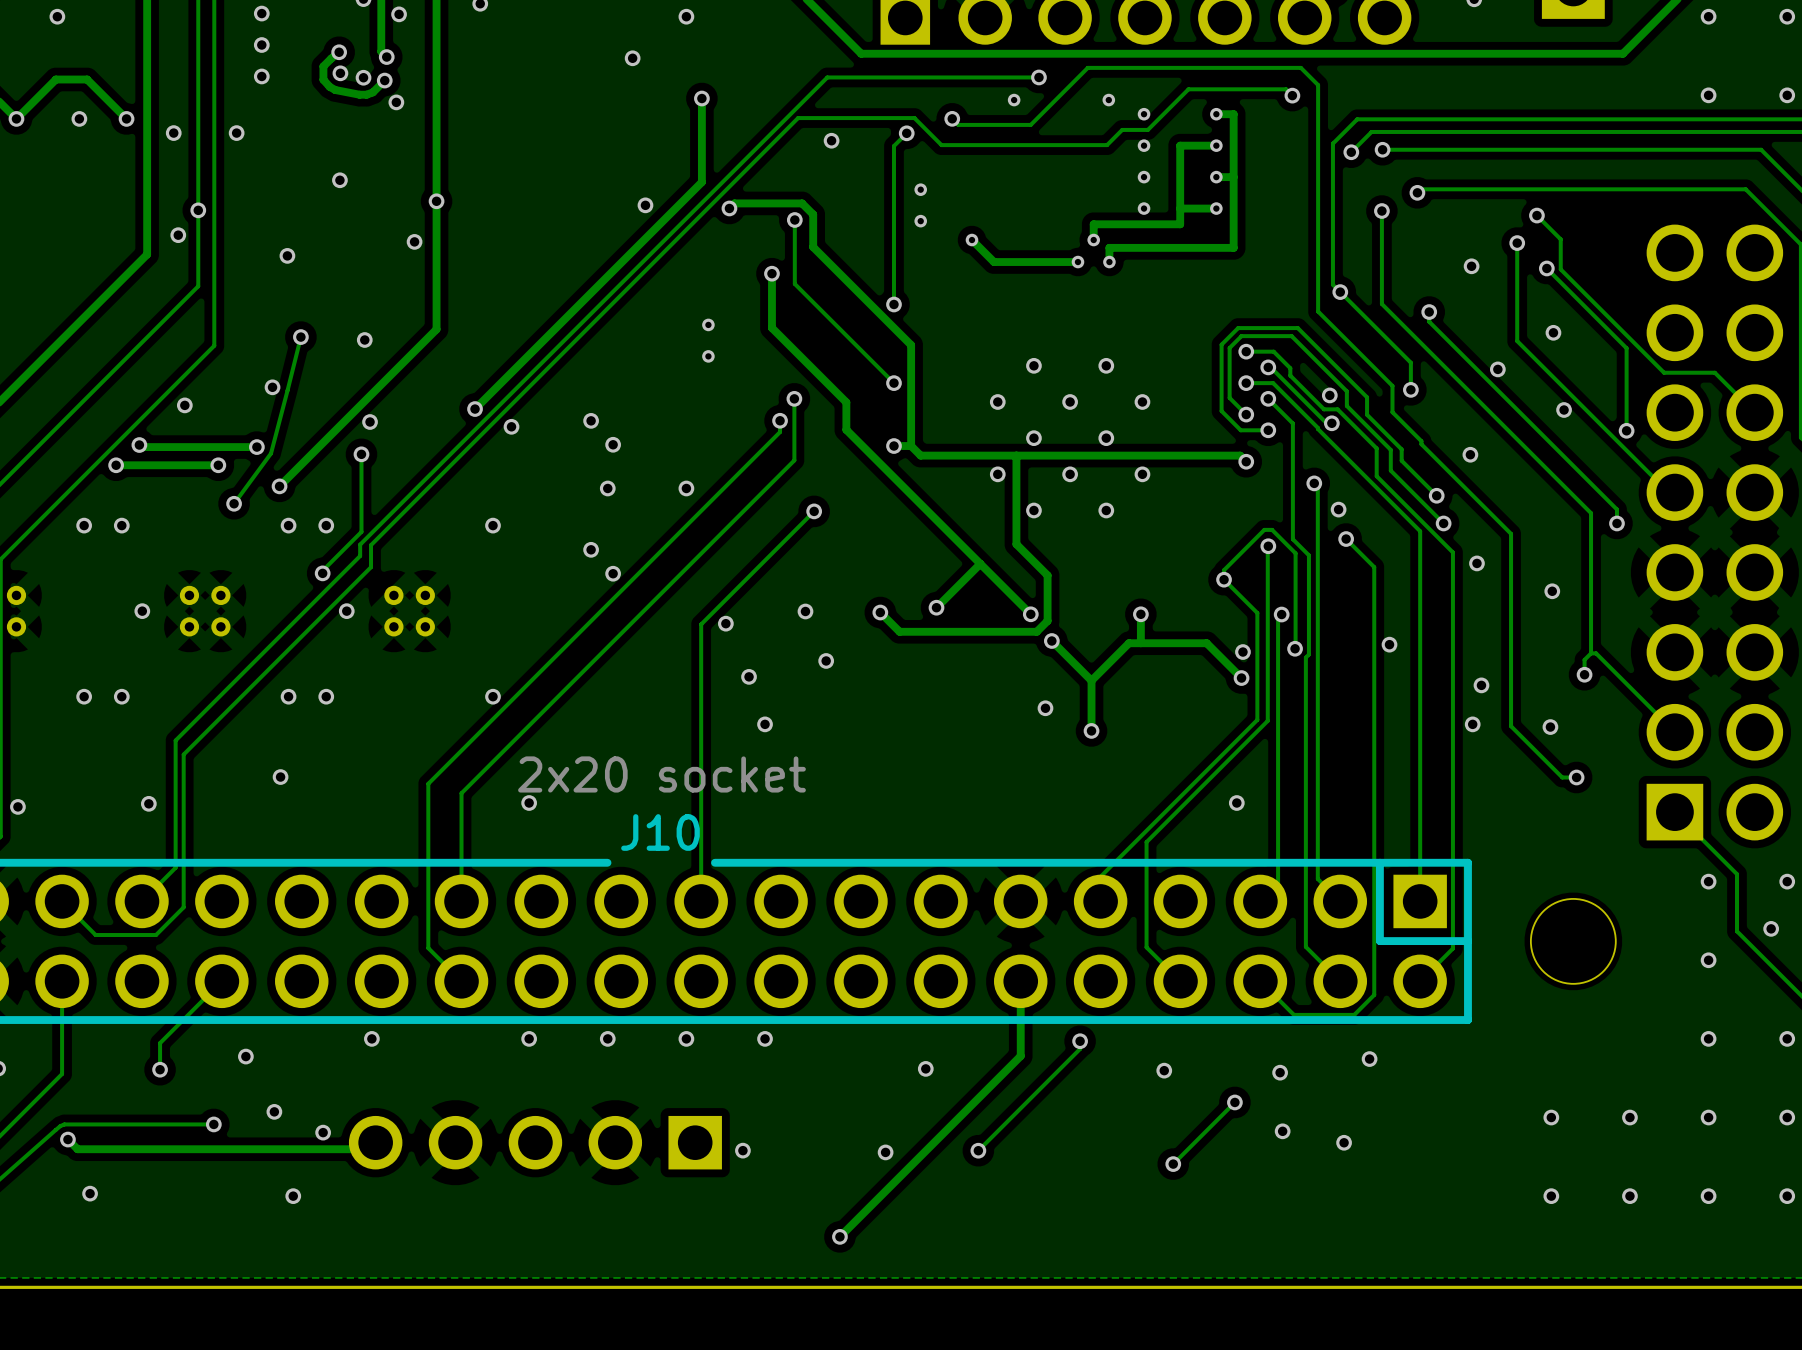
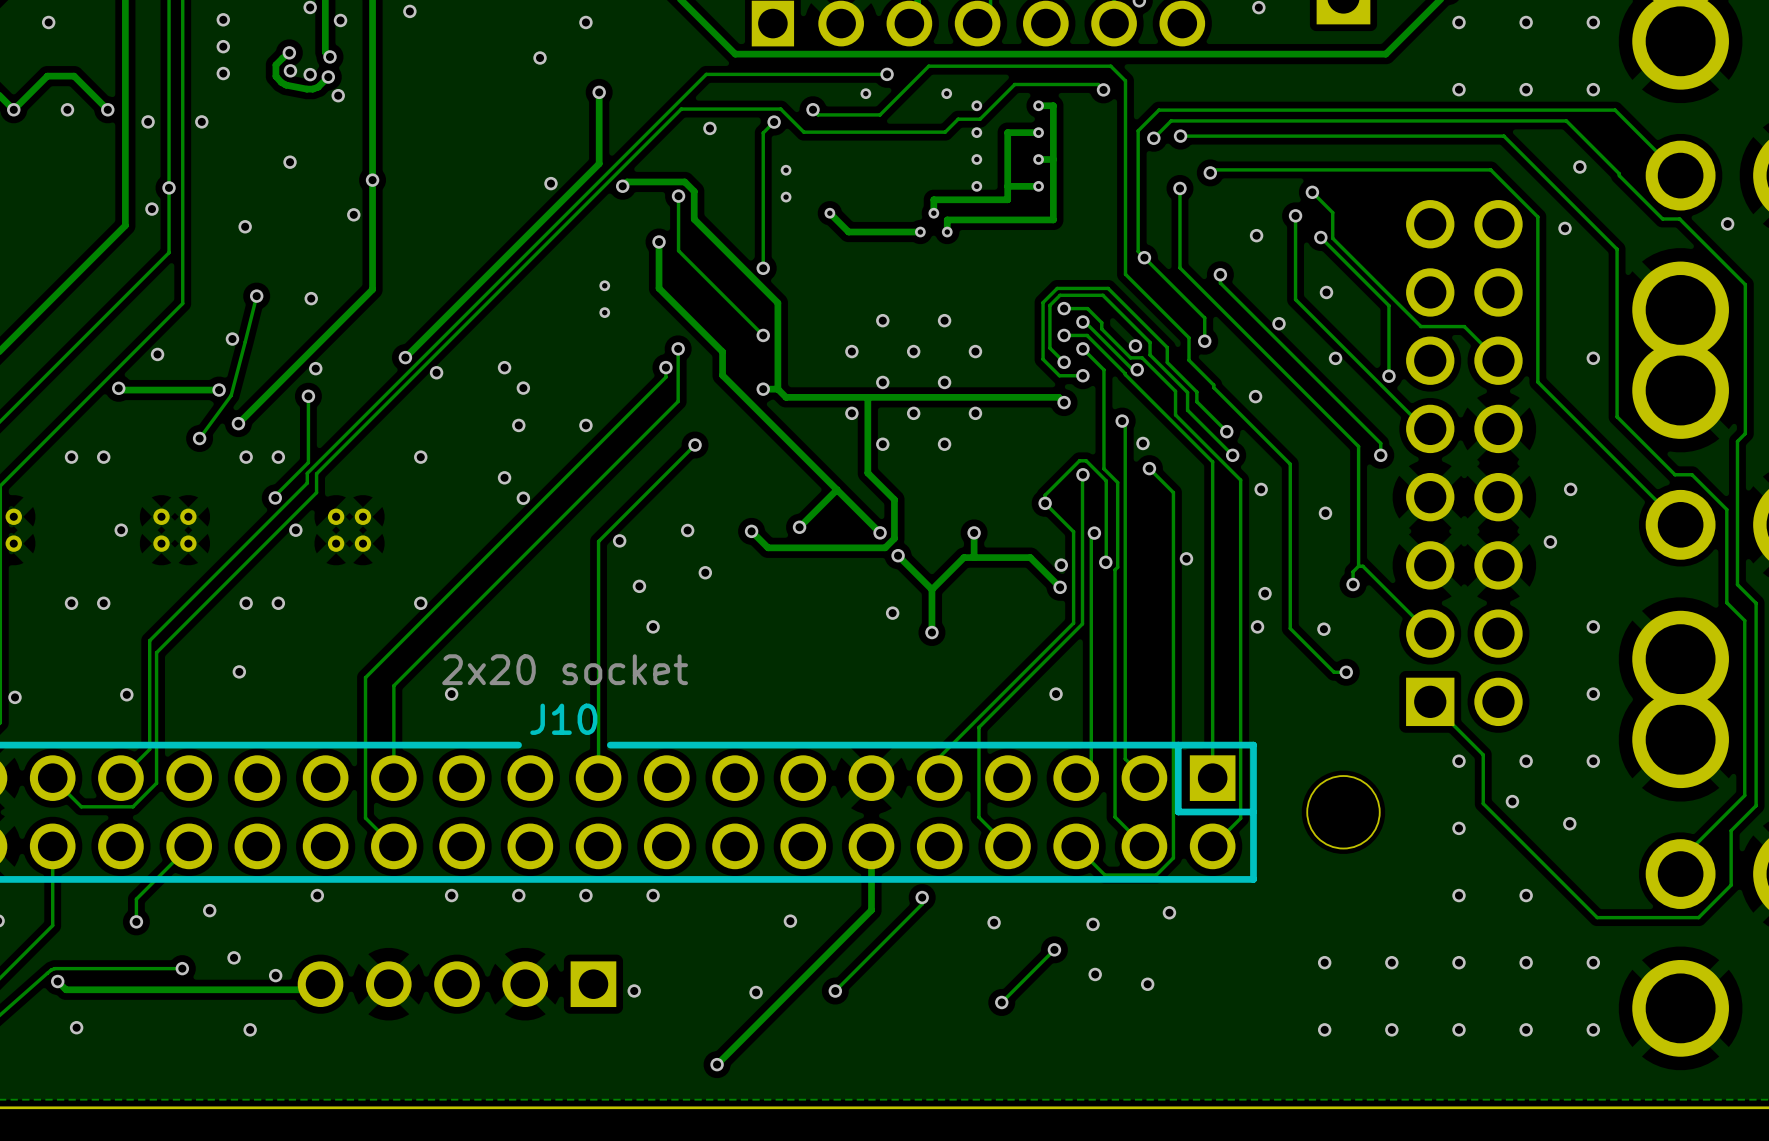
via: (116, 465) -> none
track: (218, 465) (116, 465) -> none
via: (218, 465) -> none

